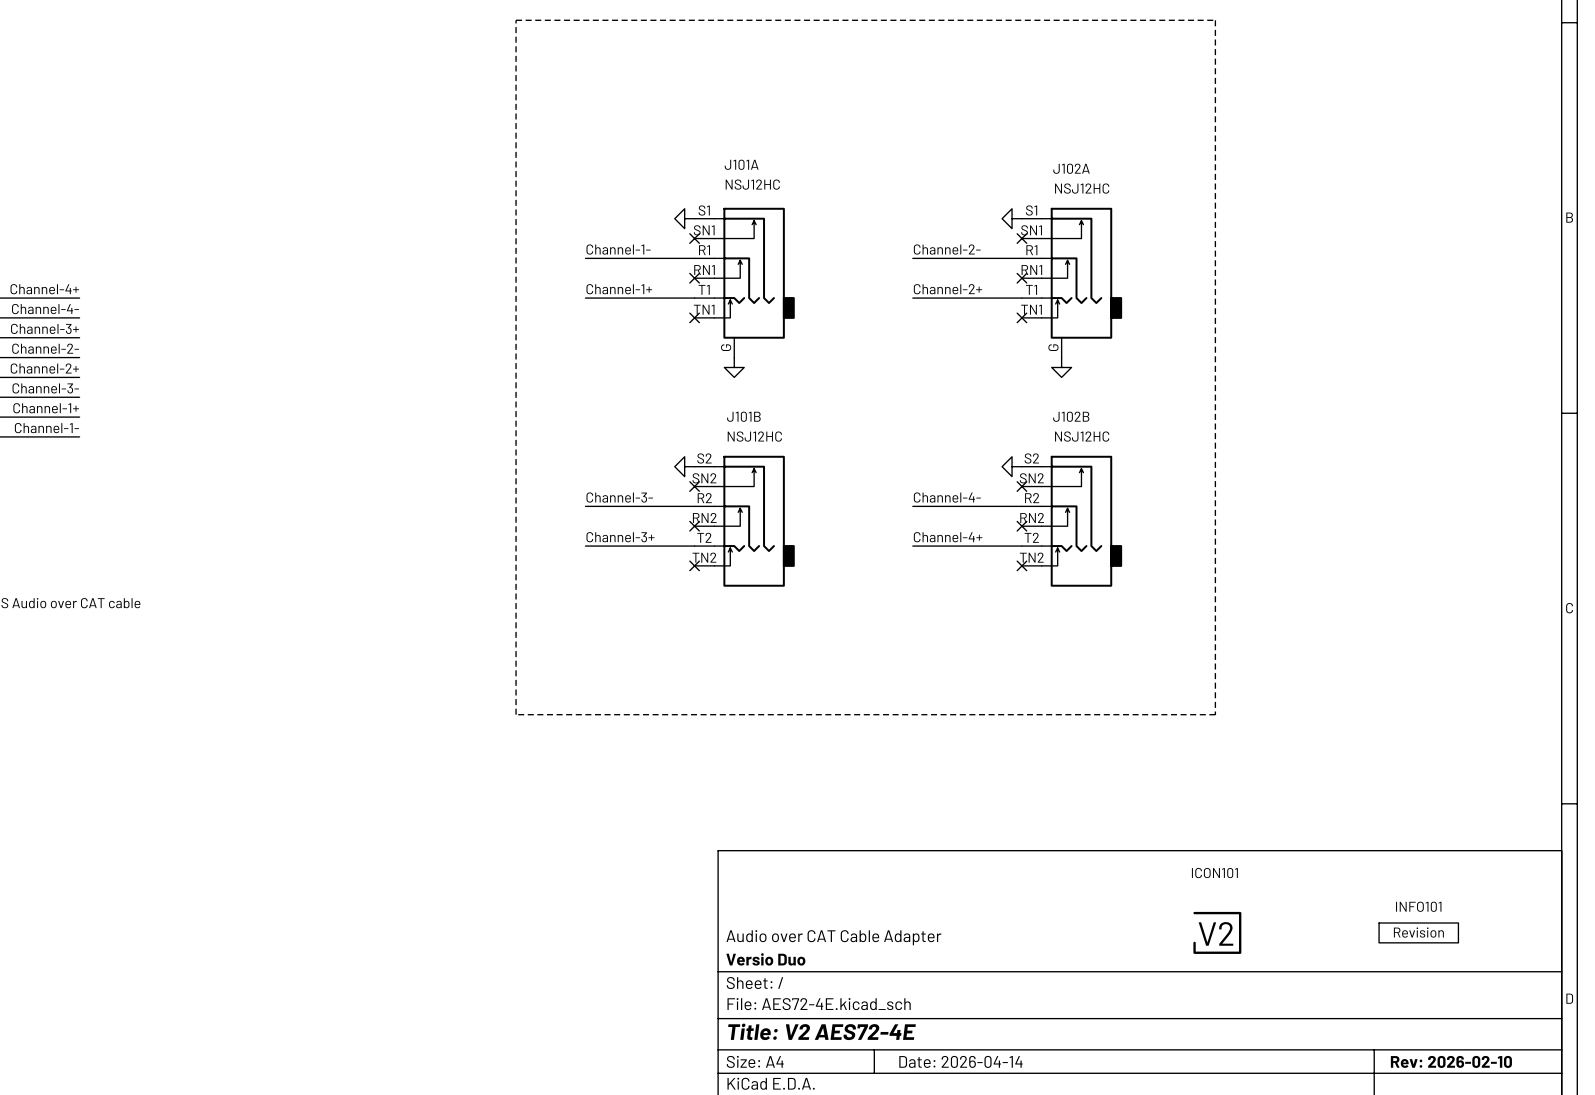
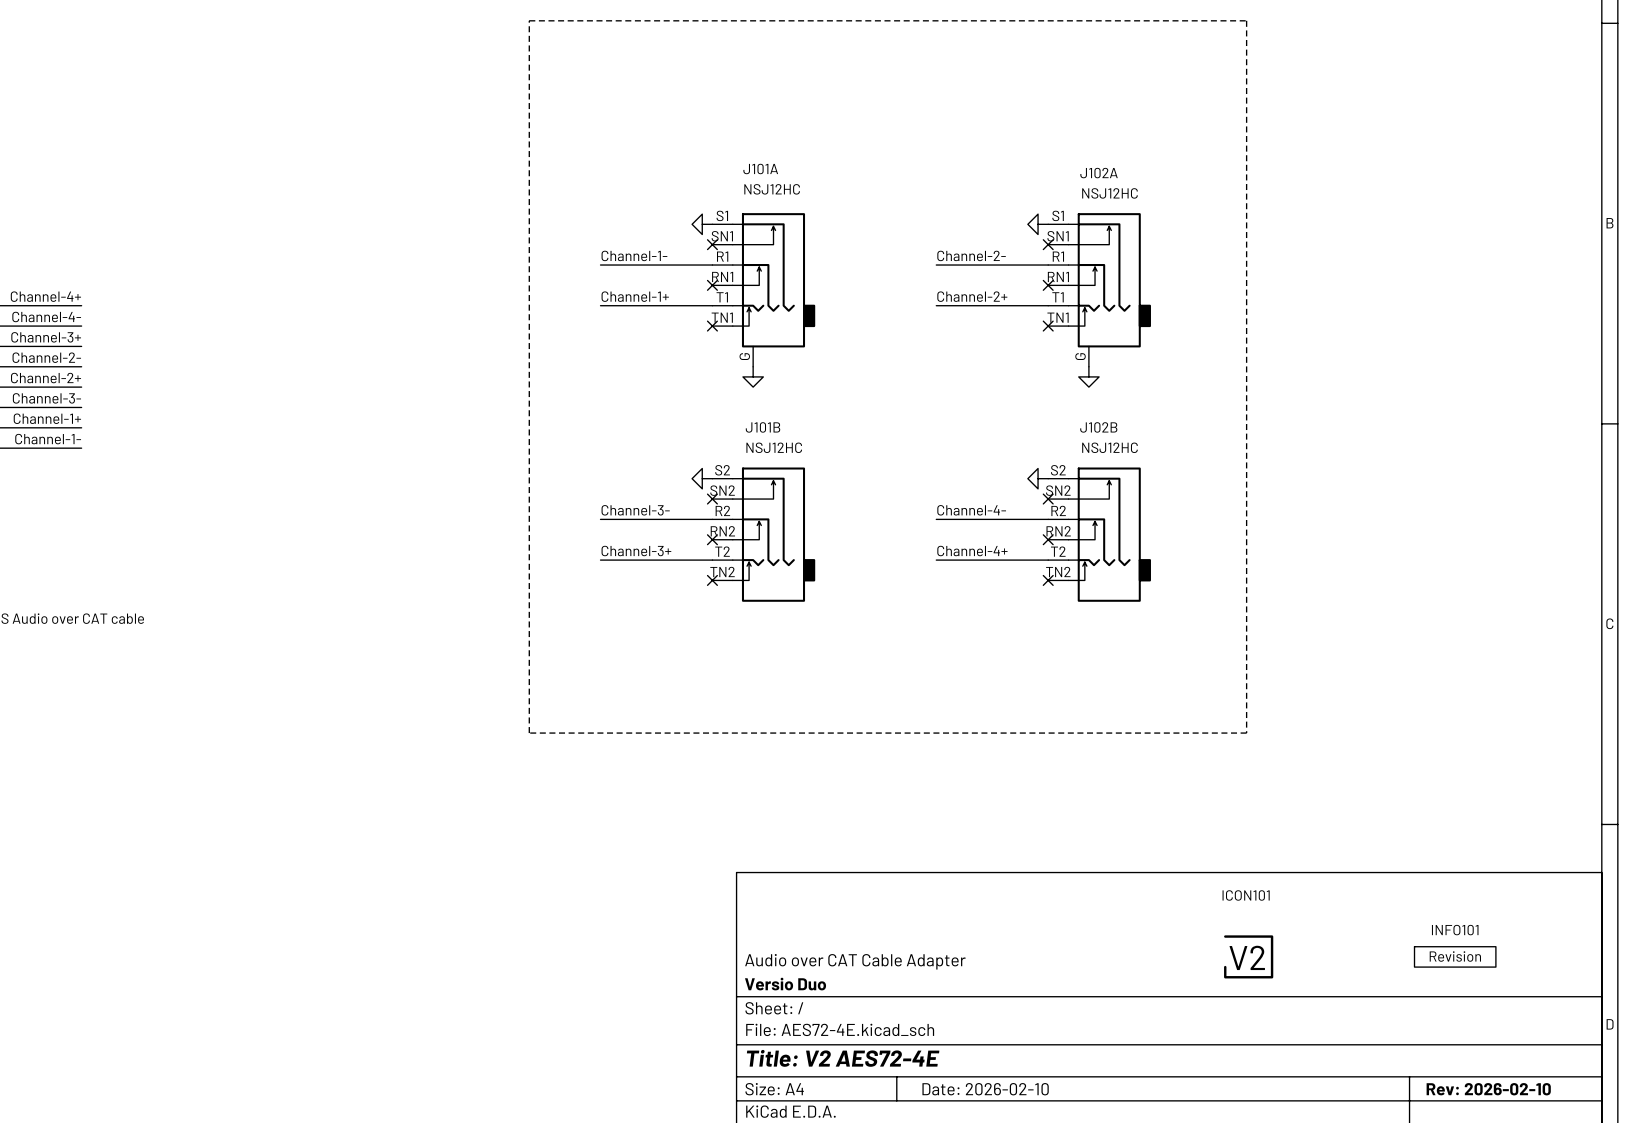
title block: Date: 2026-04-14 (960, 1061) -> Date: 2026-02-10 (985, 1089)

